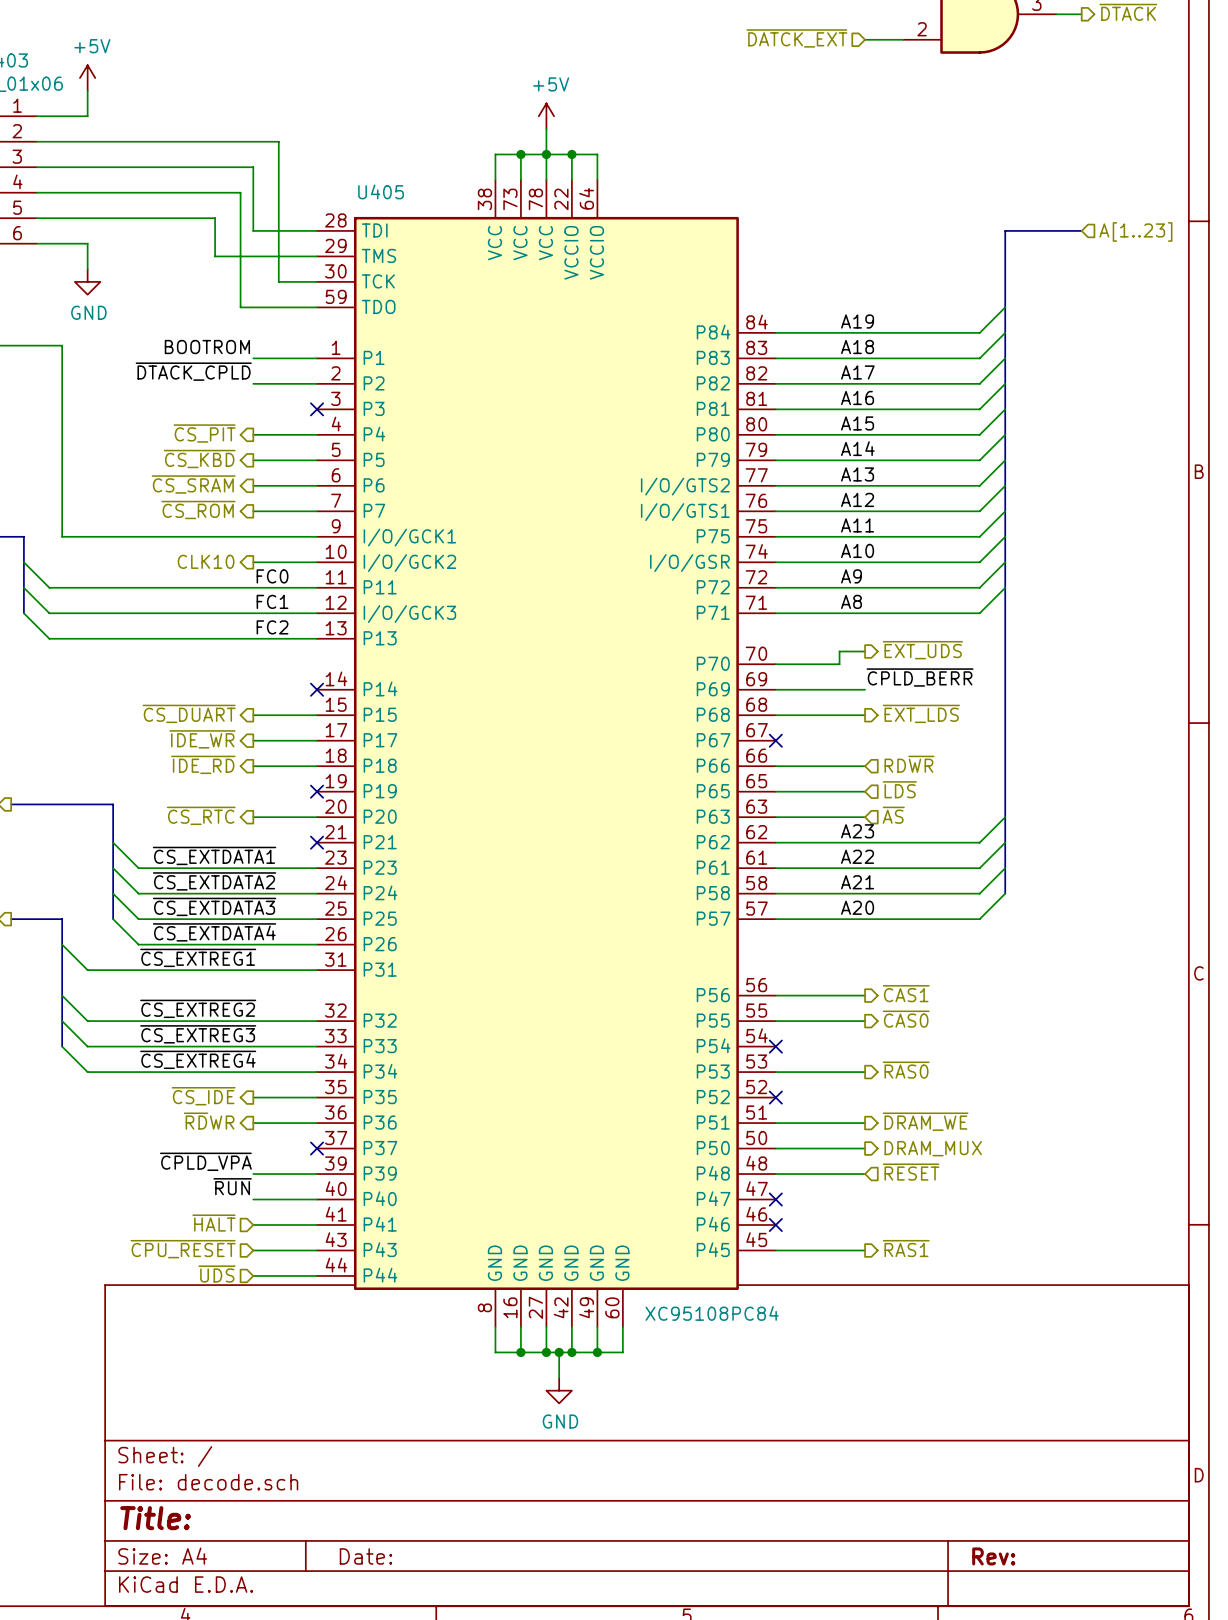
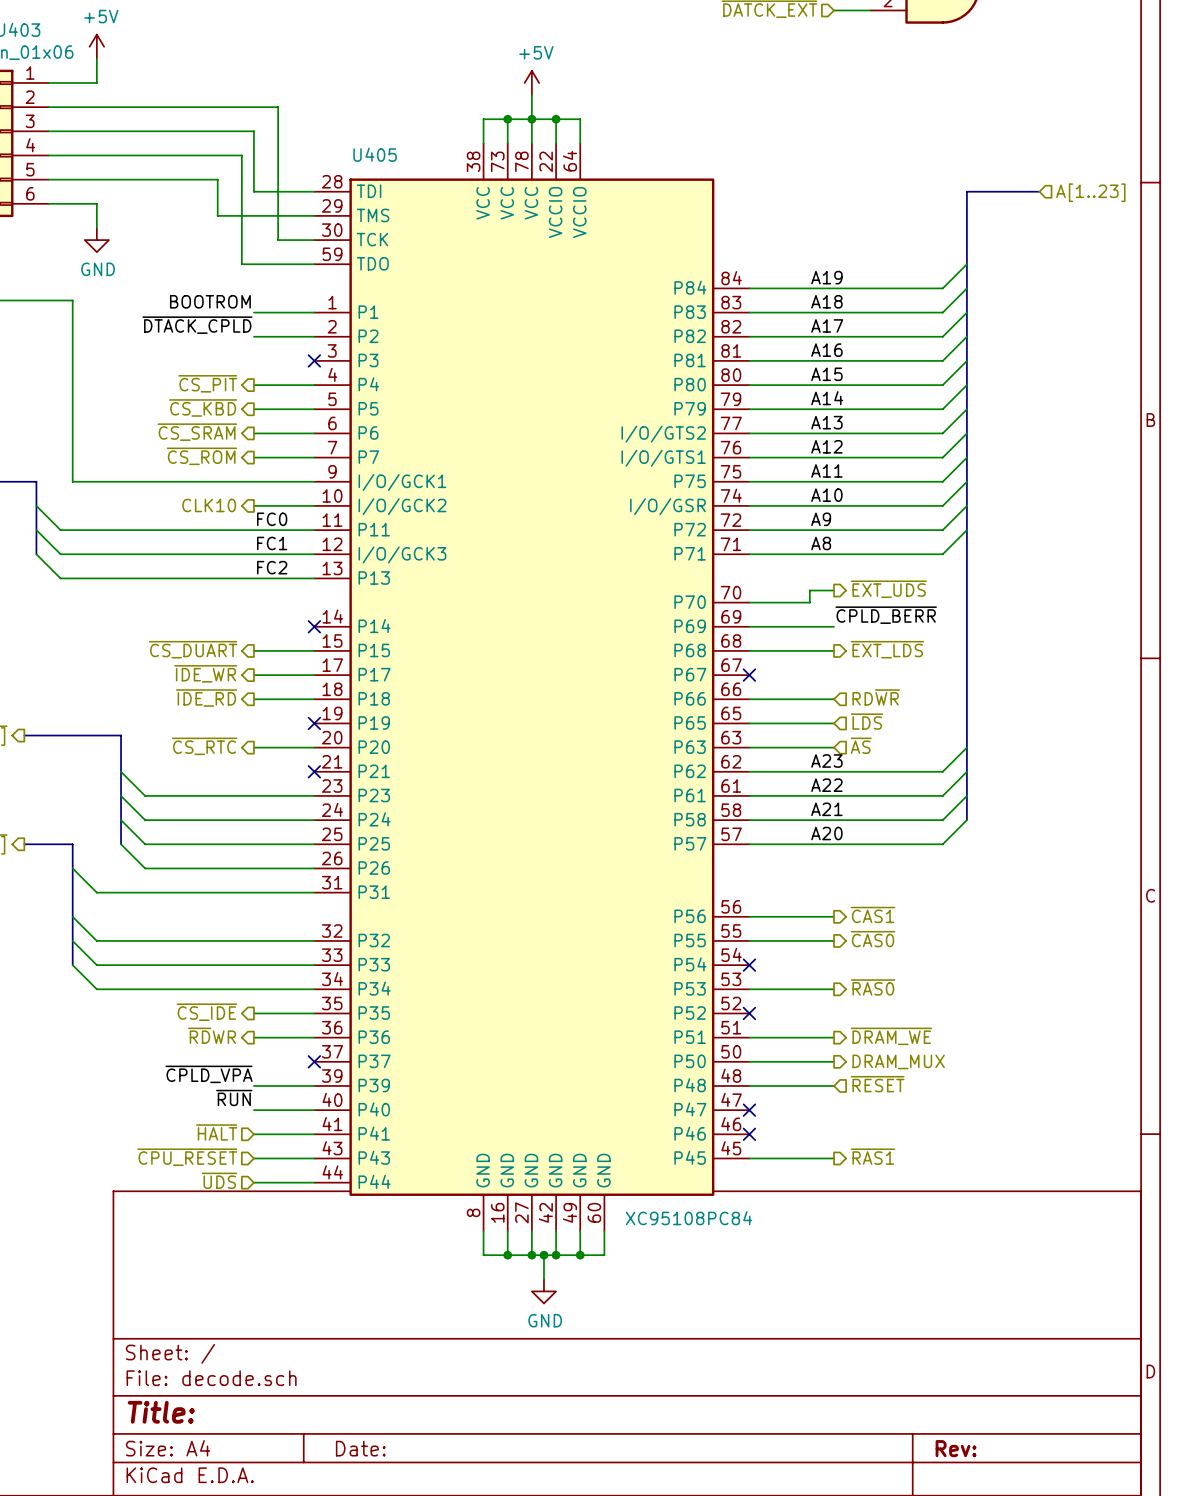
label: ~{CS_EXTDATA1} (214, 855) -> none
label: ~{CS_EXTDATA2} (214, 881) -> none
label: ~{CS_EXTDATA3} (214, 906) -> none
label: ~{CS_EXTDATA4} (214, 932) -> none
label: ~{CS_EXTREG1} (198, 957) -> none
label: ~{CS_EXTREG2} (198, 1008) -> none
label: ~{CS_EXTREG3} (198, 1034) -> none
label: ~{CS_EXTREG4} (198, 1059) -> none

